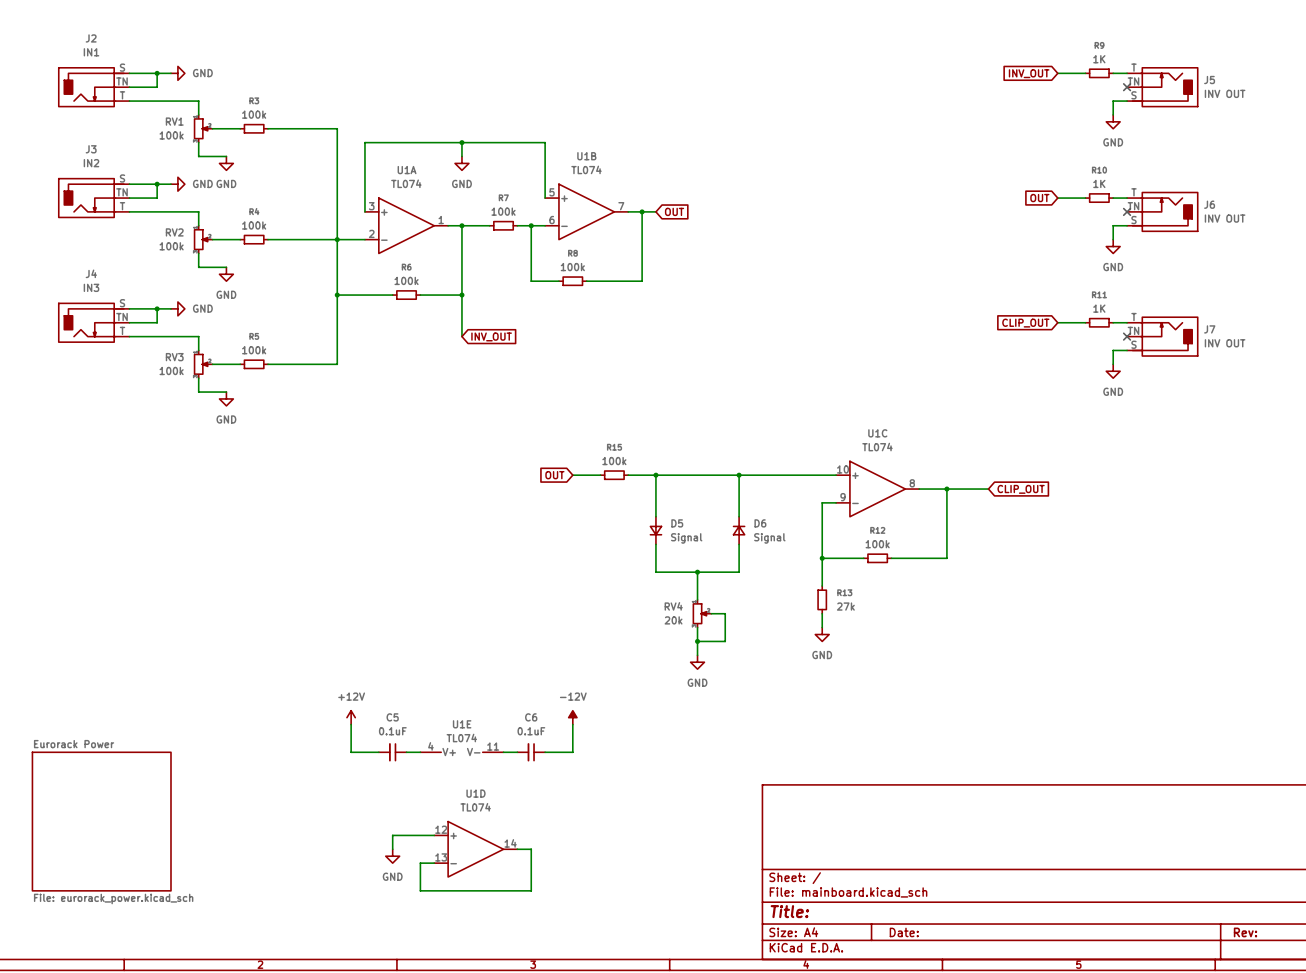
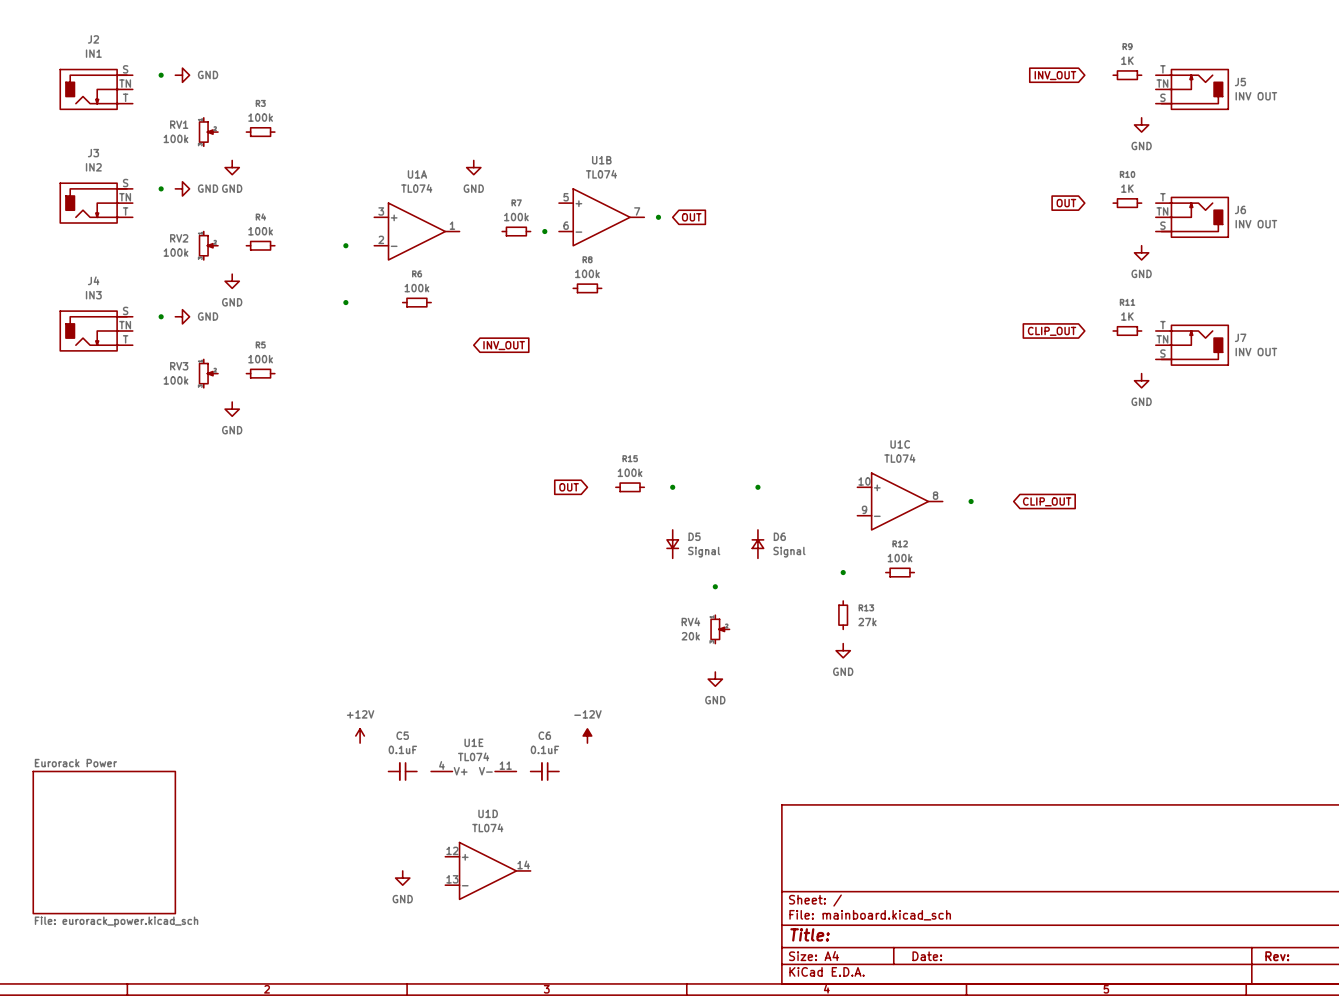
wire: (129, 73) (170, 73) -> none
wire: (157, 73) (157, 87) (129, 87) -> none
wire: (1057, 73) (1085, 73) -> none
wire: (1113, 73) (1127, 73) -> none
no-connect mark: (1127, 87) -> none
wire: (129, 101) (198, 101) (198, 114) -> none
wire: (1127, 101) (1113, 101) (1113, 114) -> none
wire: (212, 128) (240, 128) -> none
wire: (267, 128) (337, 128) (337, 364) (267, 364) -> none
wire: (198, 142) (198, 156) (226, 156) -> none
wire: (461, 142) (461, 156) -> none
junction: (461, 142) -> none
wire: (129, 184) (170, 184) -> none
wire: (157, 184) (157, 198) (129, 198) -> none
wire: (545, 198) (545, 142) (364, 142) (364, 211) -> none
wire: (1057, 198) (1085, 198) -> none
wire: (1113, 198) (1127, 198) -> none
wire: (129, 211) (198, 211) (198, 225) -> none
wire: (628, 211) (655, 211) -> none
wire: (642, 211) (642, 281) (586, 281) -> none
no-connect mark: (1127, 211) -> none
wire: (448, 225) (489, 225) -> none
wire: (461, 225) (461, 336) -> none
junction: (461, 225) -> none
wire: (517, 225) (545, 225) -> none
wire: (531, 225) (531, 281) (558, 281) -> none
wire: (1127, 225) (1113, 225) (1113, 239) -> none
wire: (212, 239) (240, 239) -> none
wire: (267, 239) (364, 239) -> none
wire: (198, 253) (198, 267) (226, 267) -> none
wire: (337, 295) (392, 295) -> none
wire: (420, 295) (461, 295) -> none
junction: (461, 295) -> none
wire: (129, 308) (170, 308) -> none
wire: (157, 308) (157, 322) (129, 322) -> none
wire: (1057, 322) (1085, 322) -> none
wire: (1113, 322) (1127, 322) -> none
wire: (129, 336) (198, 336) (198, 350) -> none
no-connect mark: (1127, 336) -> none
wire: (1127, 350) (1113, 350) (1113, 364) -> none
wire: (212, 364) (240, 364) -> none
wire: (198, 378) (198, 392) (226, 392) -> none
wire: (572, 475) (600, 475) -> none
wire: (628, 475) (836, 475) -> none
wire: (655, 475) (655, 516) -> none
wire: (739, 475) (739, 516) -> none
wire: (919, 489) (988, 489) -> none
wire: (946, 489) (946, 558) (891, 558) -> none
wire: (836, 502) (822, 502) (822, 586) -> none
wire: (655, 544) (655, 572) (739, 572) (739, 544) -> none
wire: (822, 558) (863, 558) -> none
wire: (697, 572) (697, 599) -> none
wire: (711, 613) (725, 613) (725, 641) (697, 641) -> none
wire: (822, 613) (822, 627) -> none
wire: (697, 627) (697, 655) -> none
junction: (697, 641) -> none
wire: (351, 724) (351, 752) (378, 752) -> none
wire: (572, 724) (572, 752) (545, 752) -> none
wire: (406, 752) (420, 752) -> none
wire: (503, 752) (517, 752) -> none
wire: (434, 835) (392, 835) (392, 849) -> none
wire: (517, 849) (531, 849) (531, 890) (420, 890) (420, 863) (434, 863) -> none

